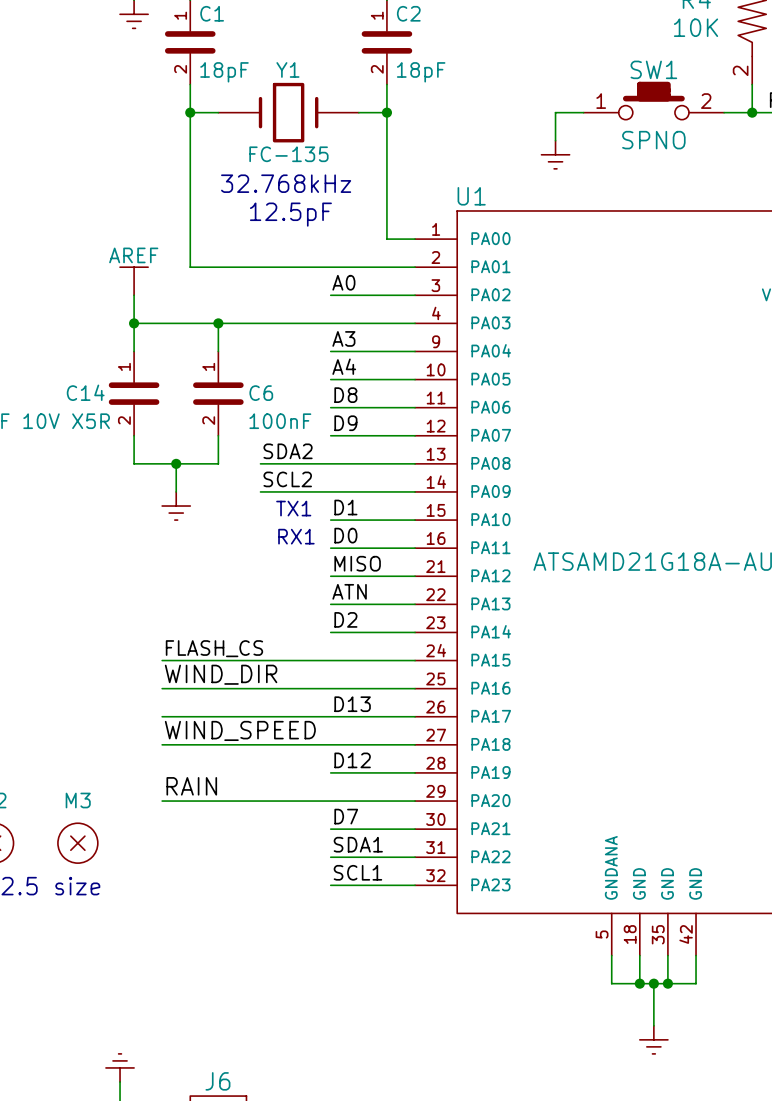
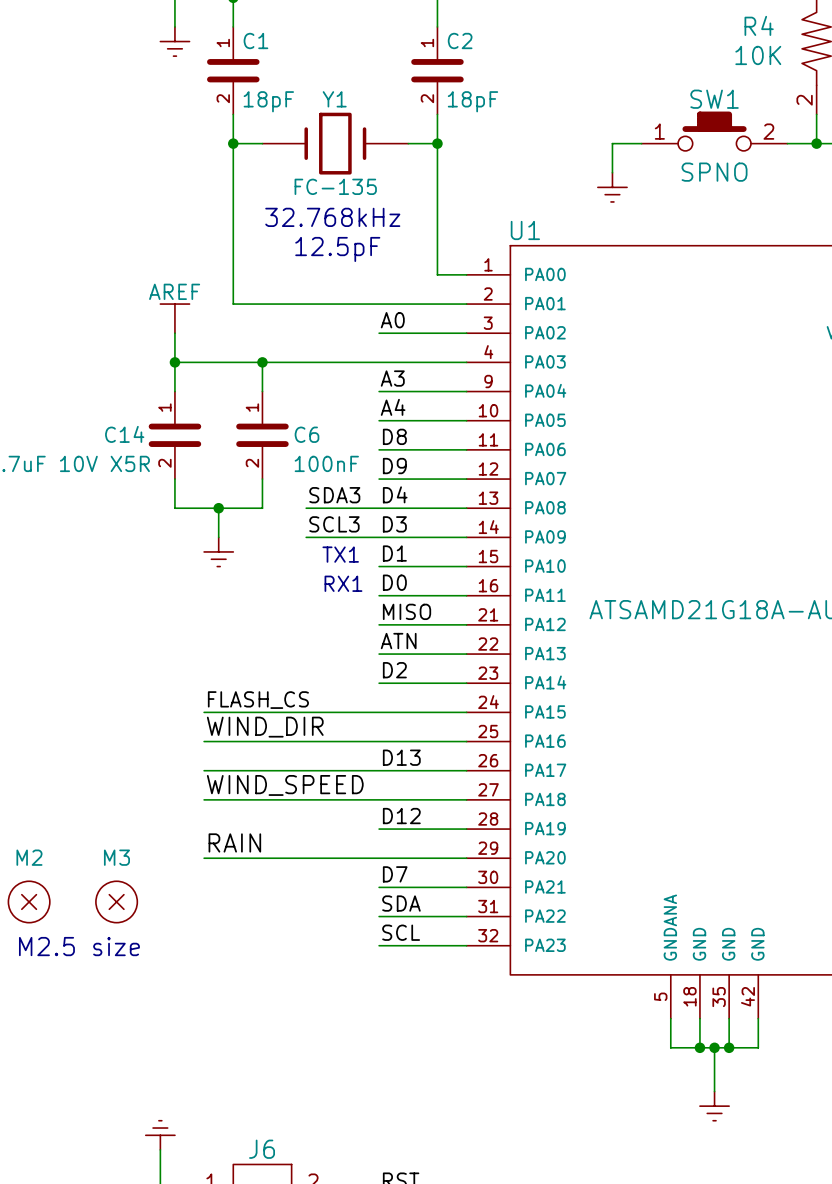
label: none -> D4 (395, 494)
label: SDA2 (288, 451) -> SDA3 (334, 495)
label: SCL2 (287, 479) -> SCL3 (334, 524)
label: none -> D3 (394, 524)
label: SDA1 (358, 844) -> SDA (401, 903)
label: SCL1 (357, 872) -> SCL (401, 932)

